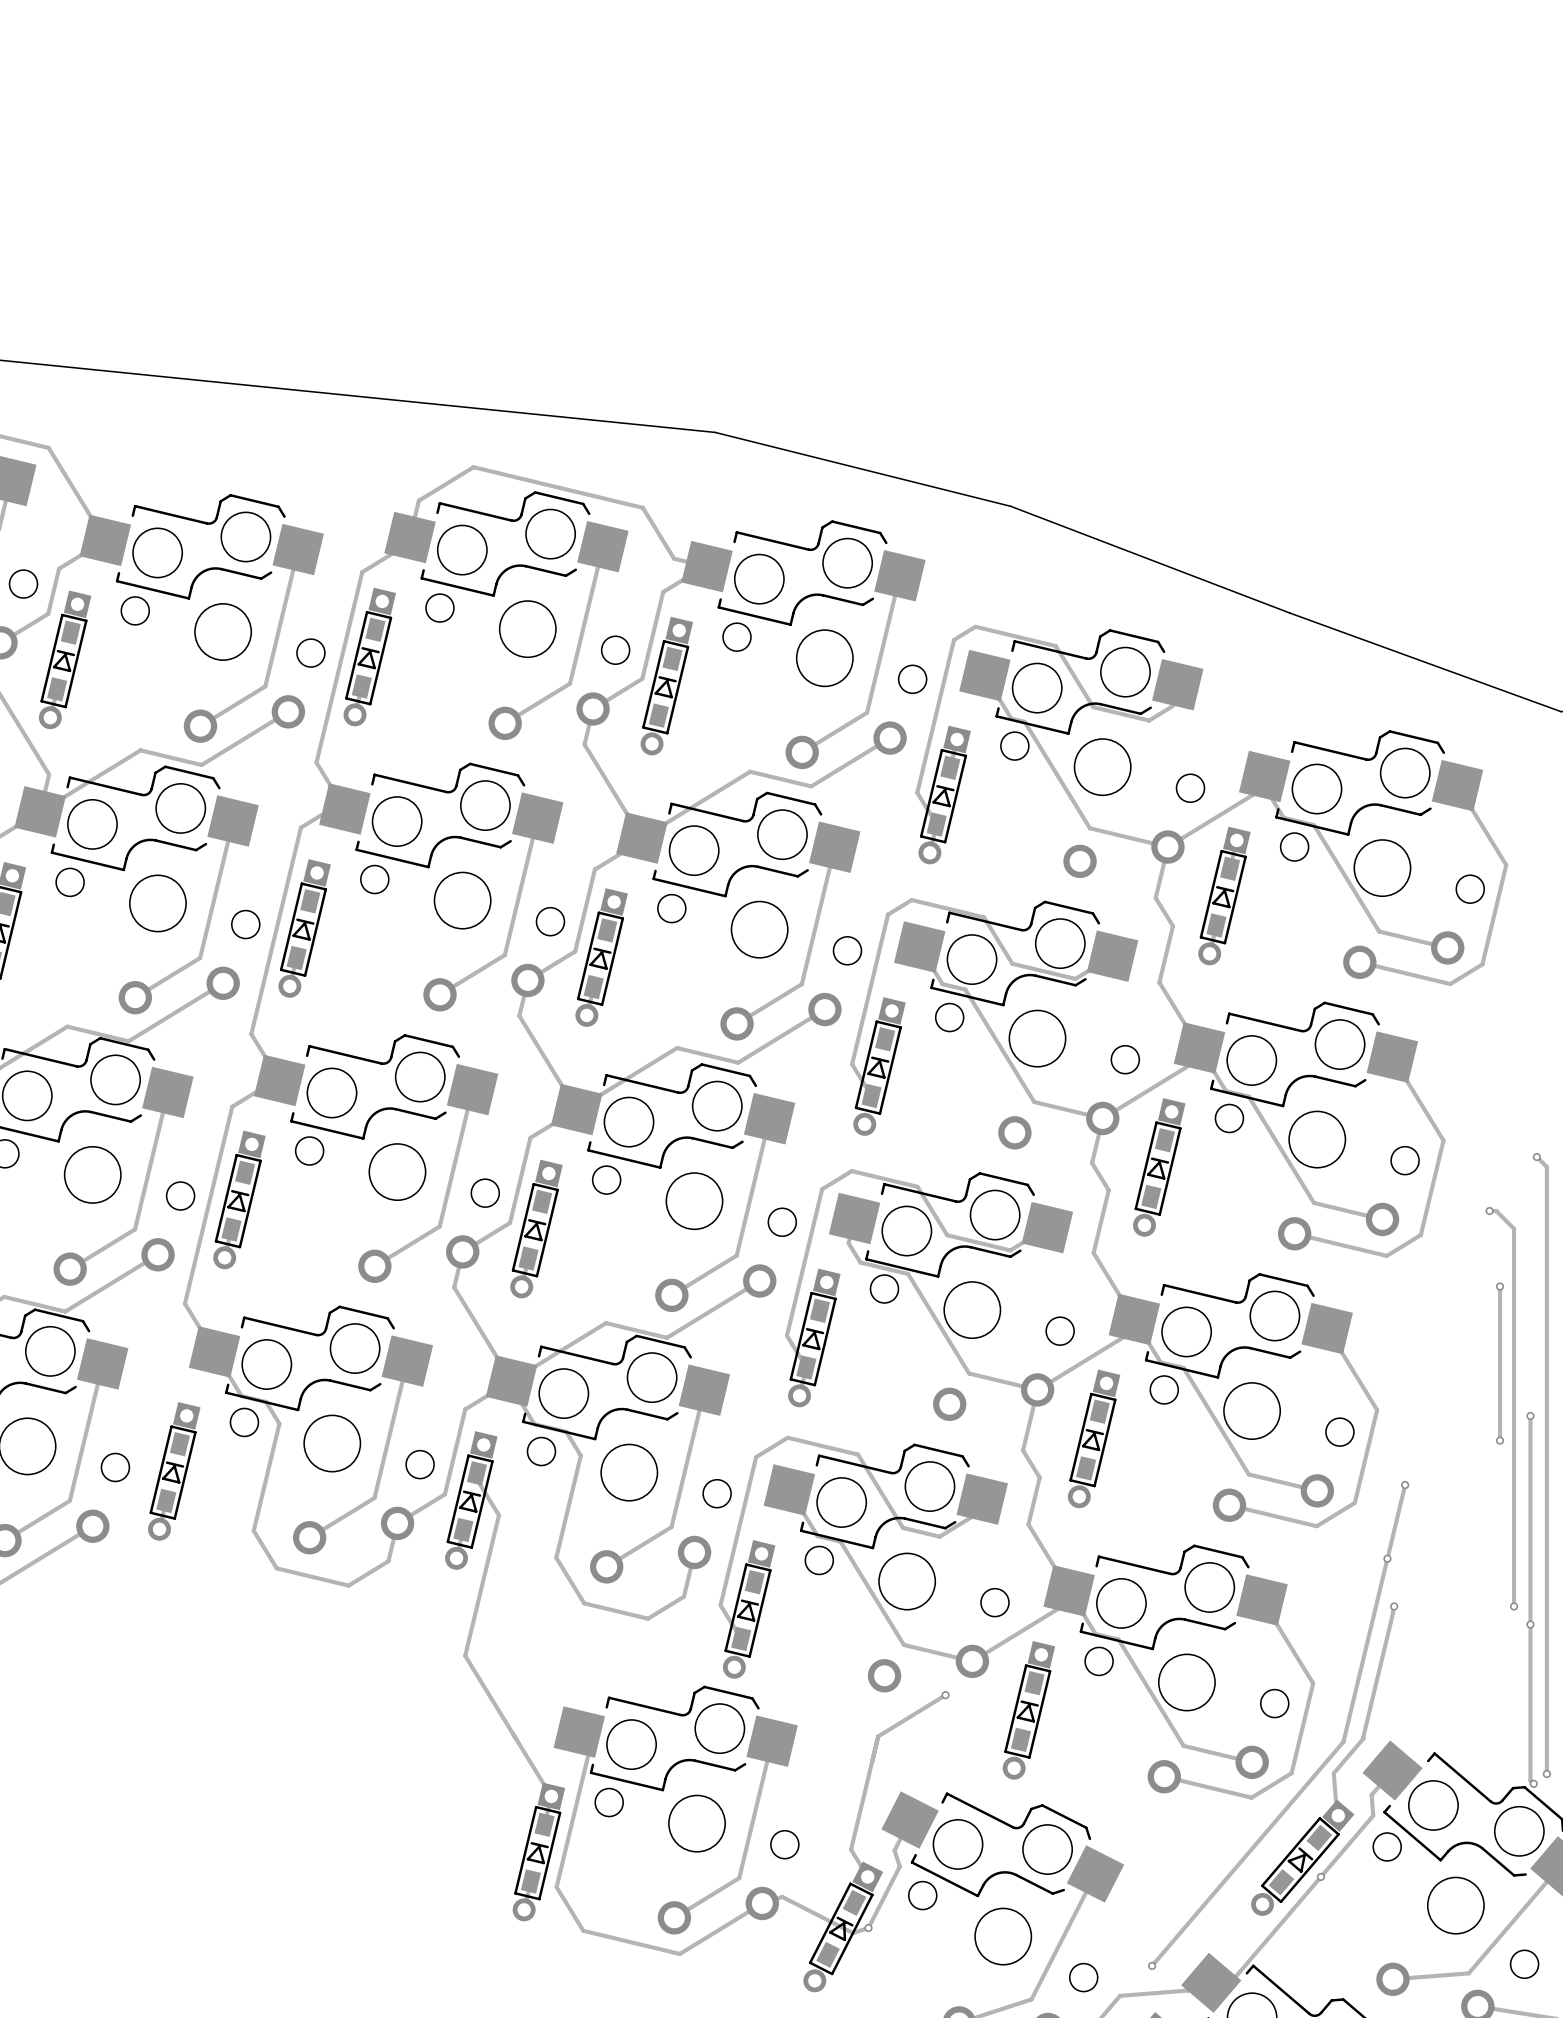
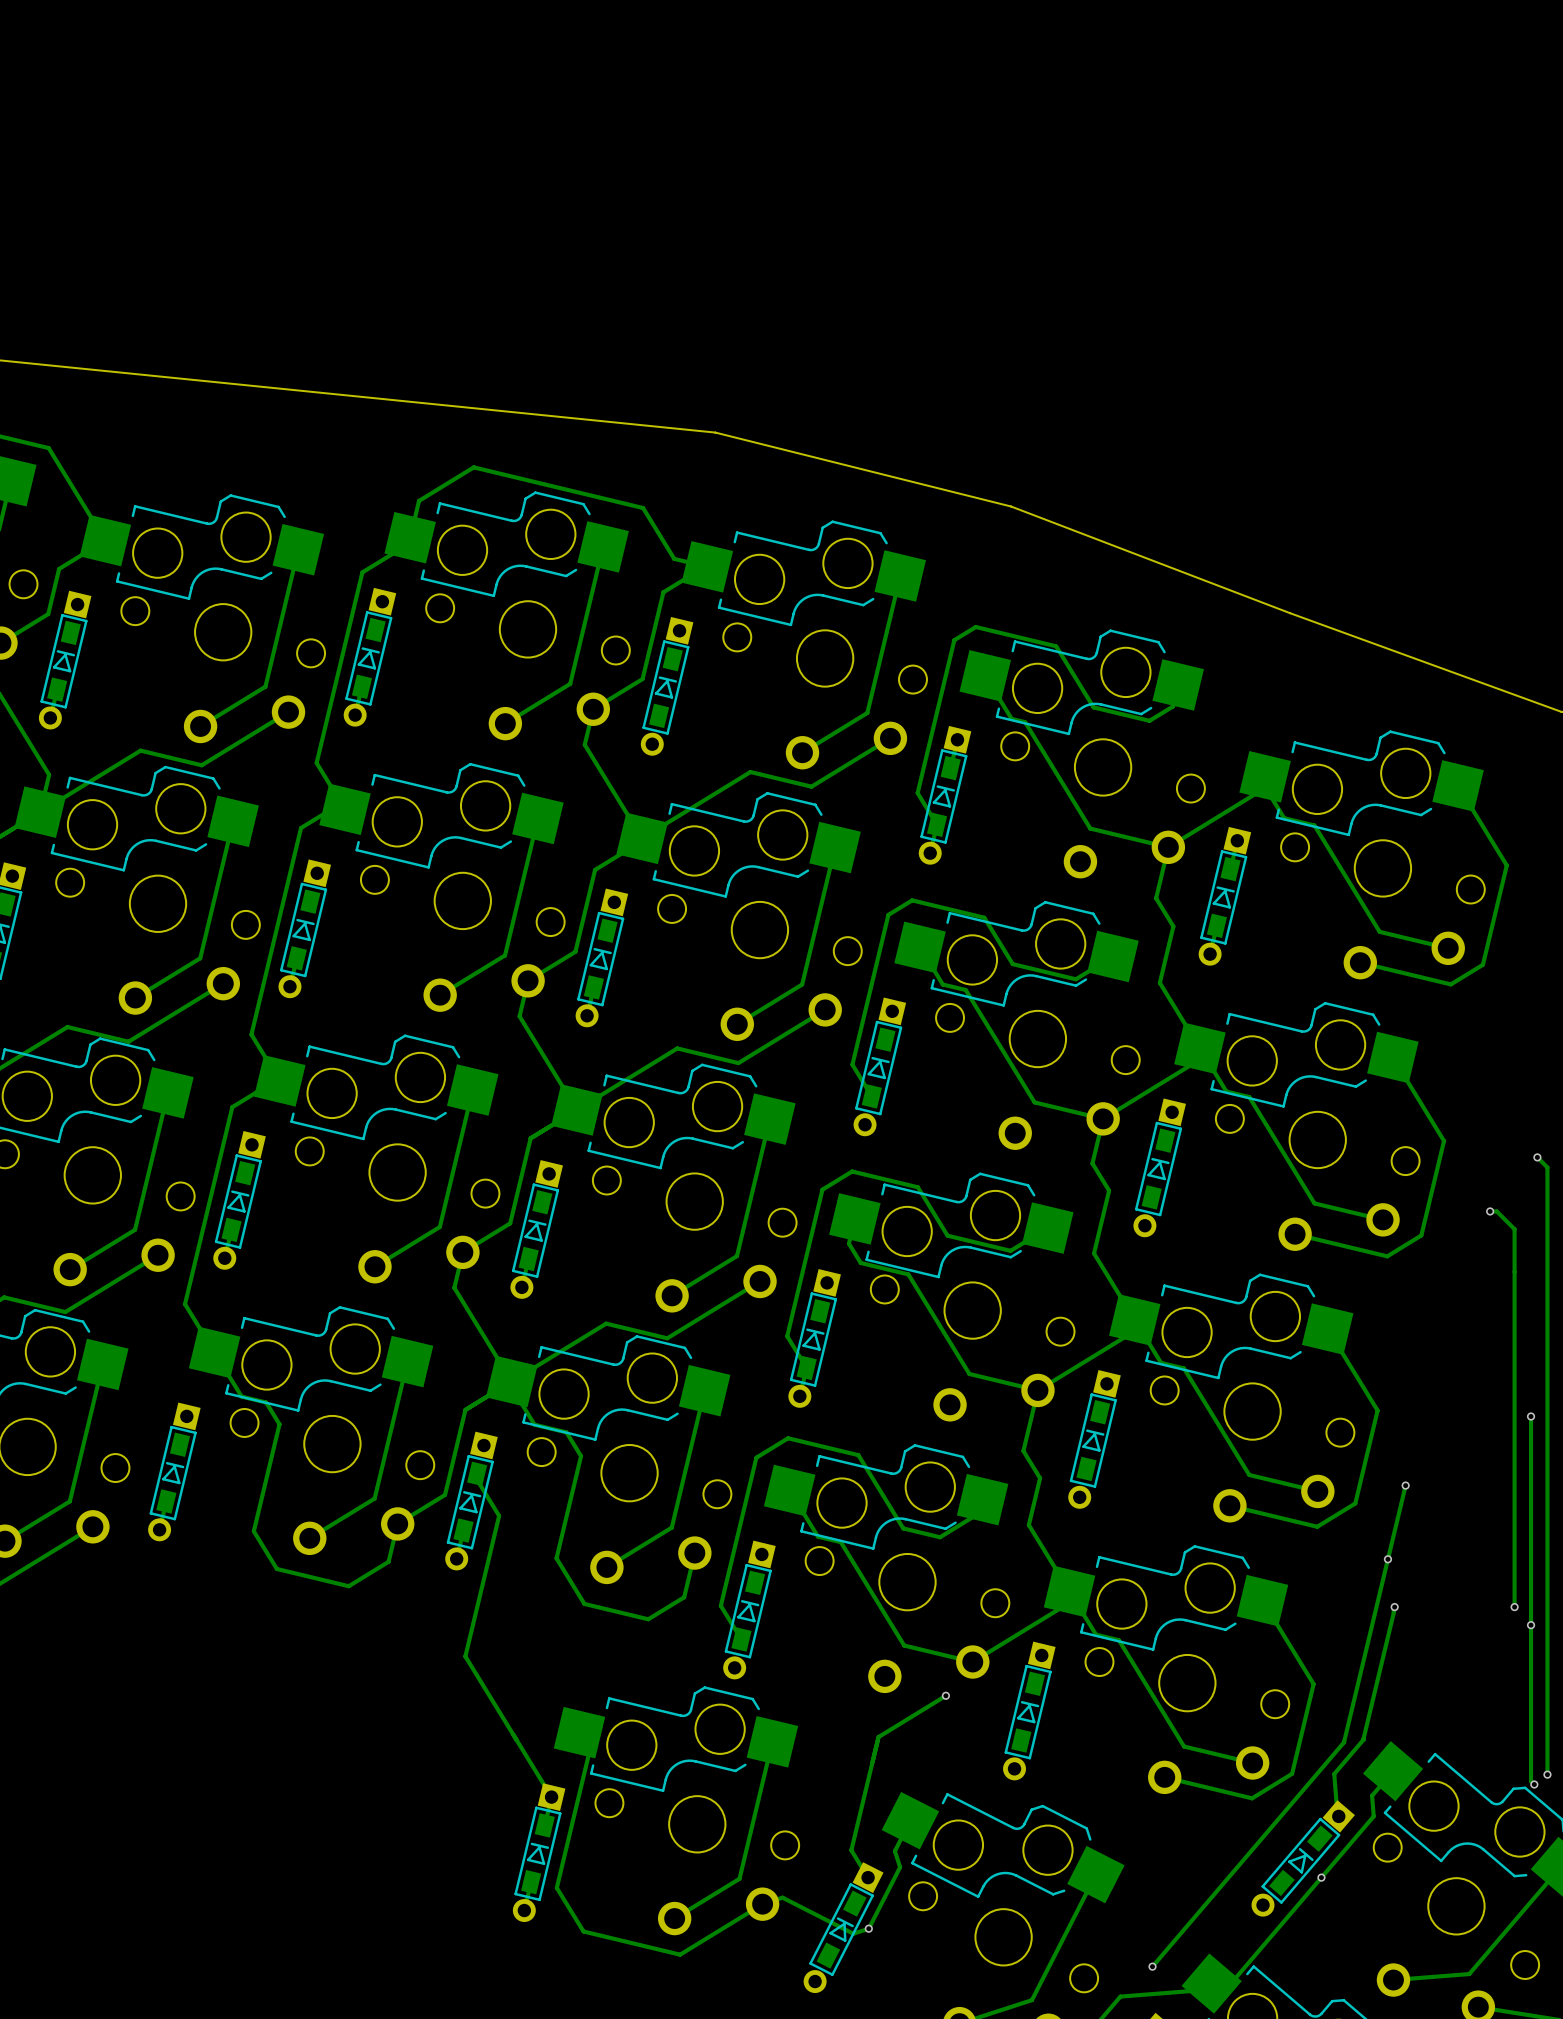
track: (1500, 1286) (1500, 1440) -> none
via: (1500, 1286) -> none
via: (1500, 1440) -> none

